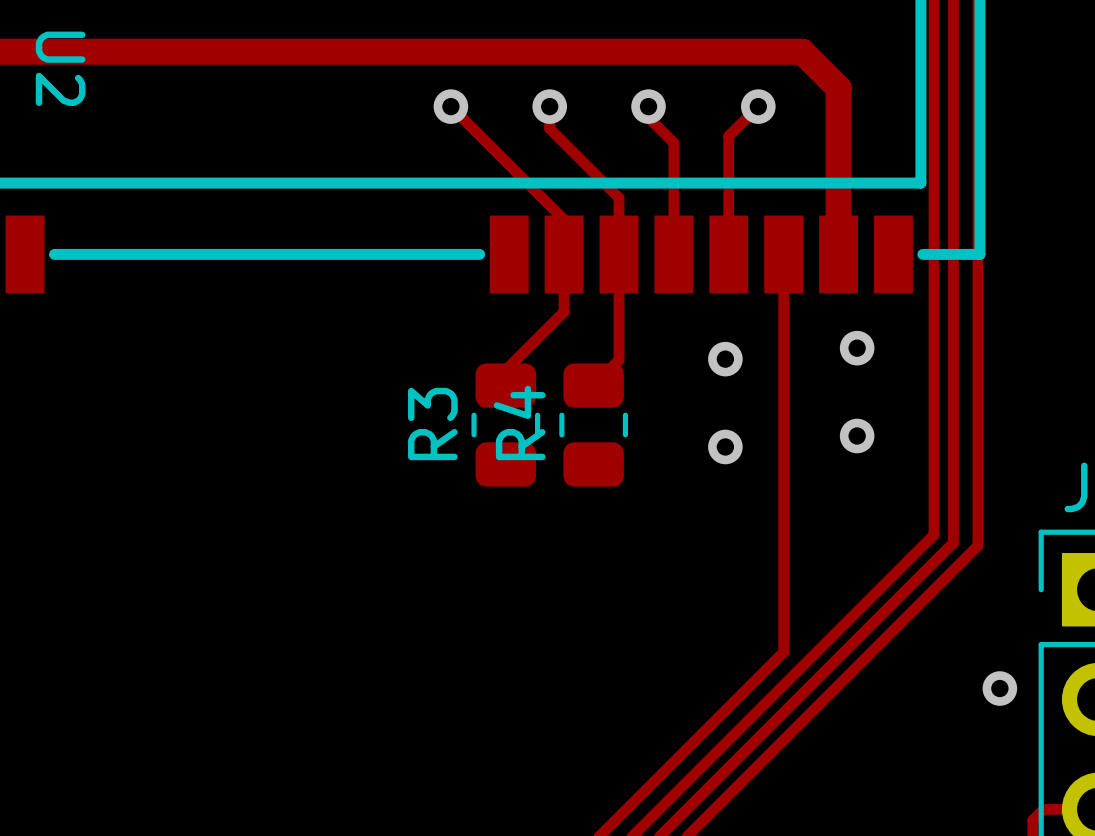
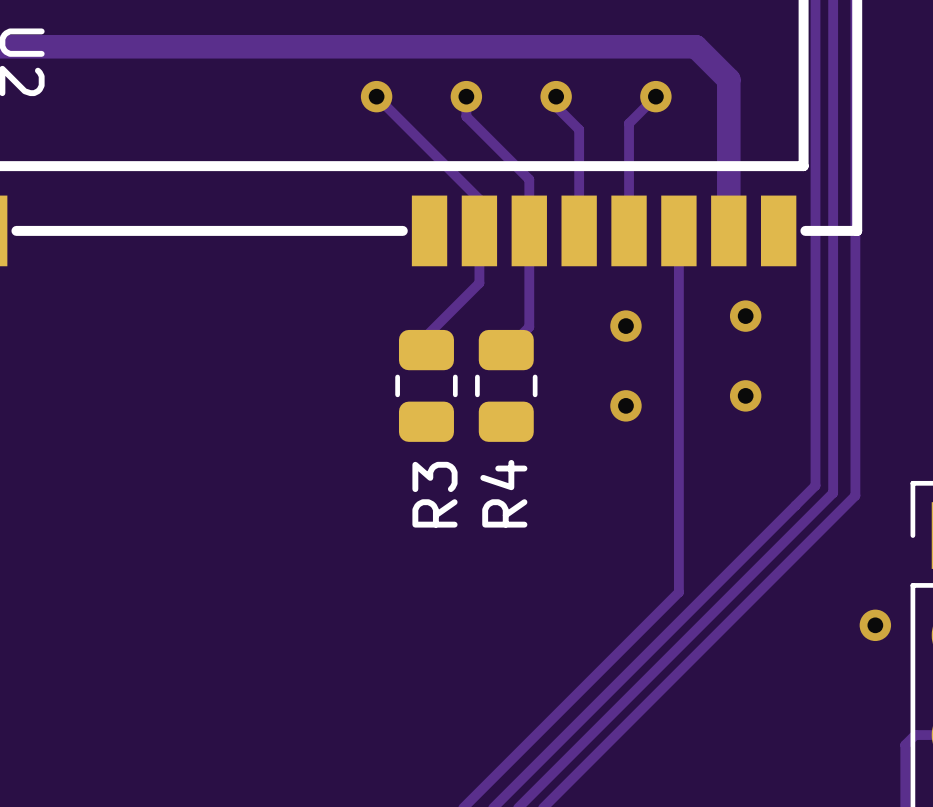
R4 name position: R4 (519, 422) -> R4 (503, 493)
R3 name position: R3 (432, 423) -> R3 (434, 494)

